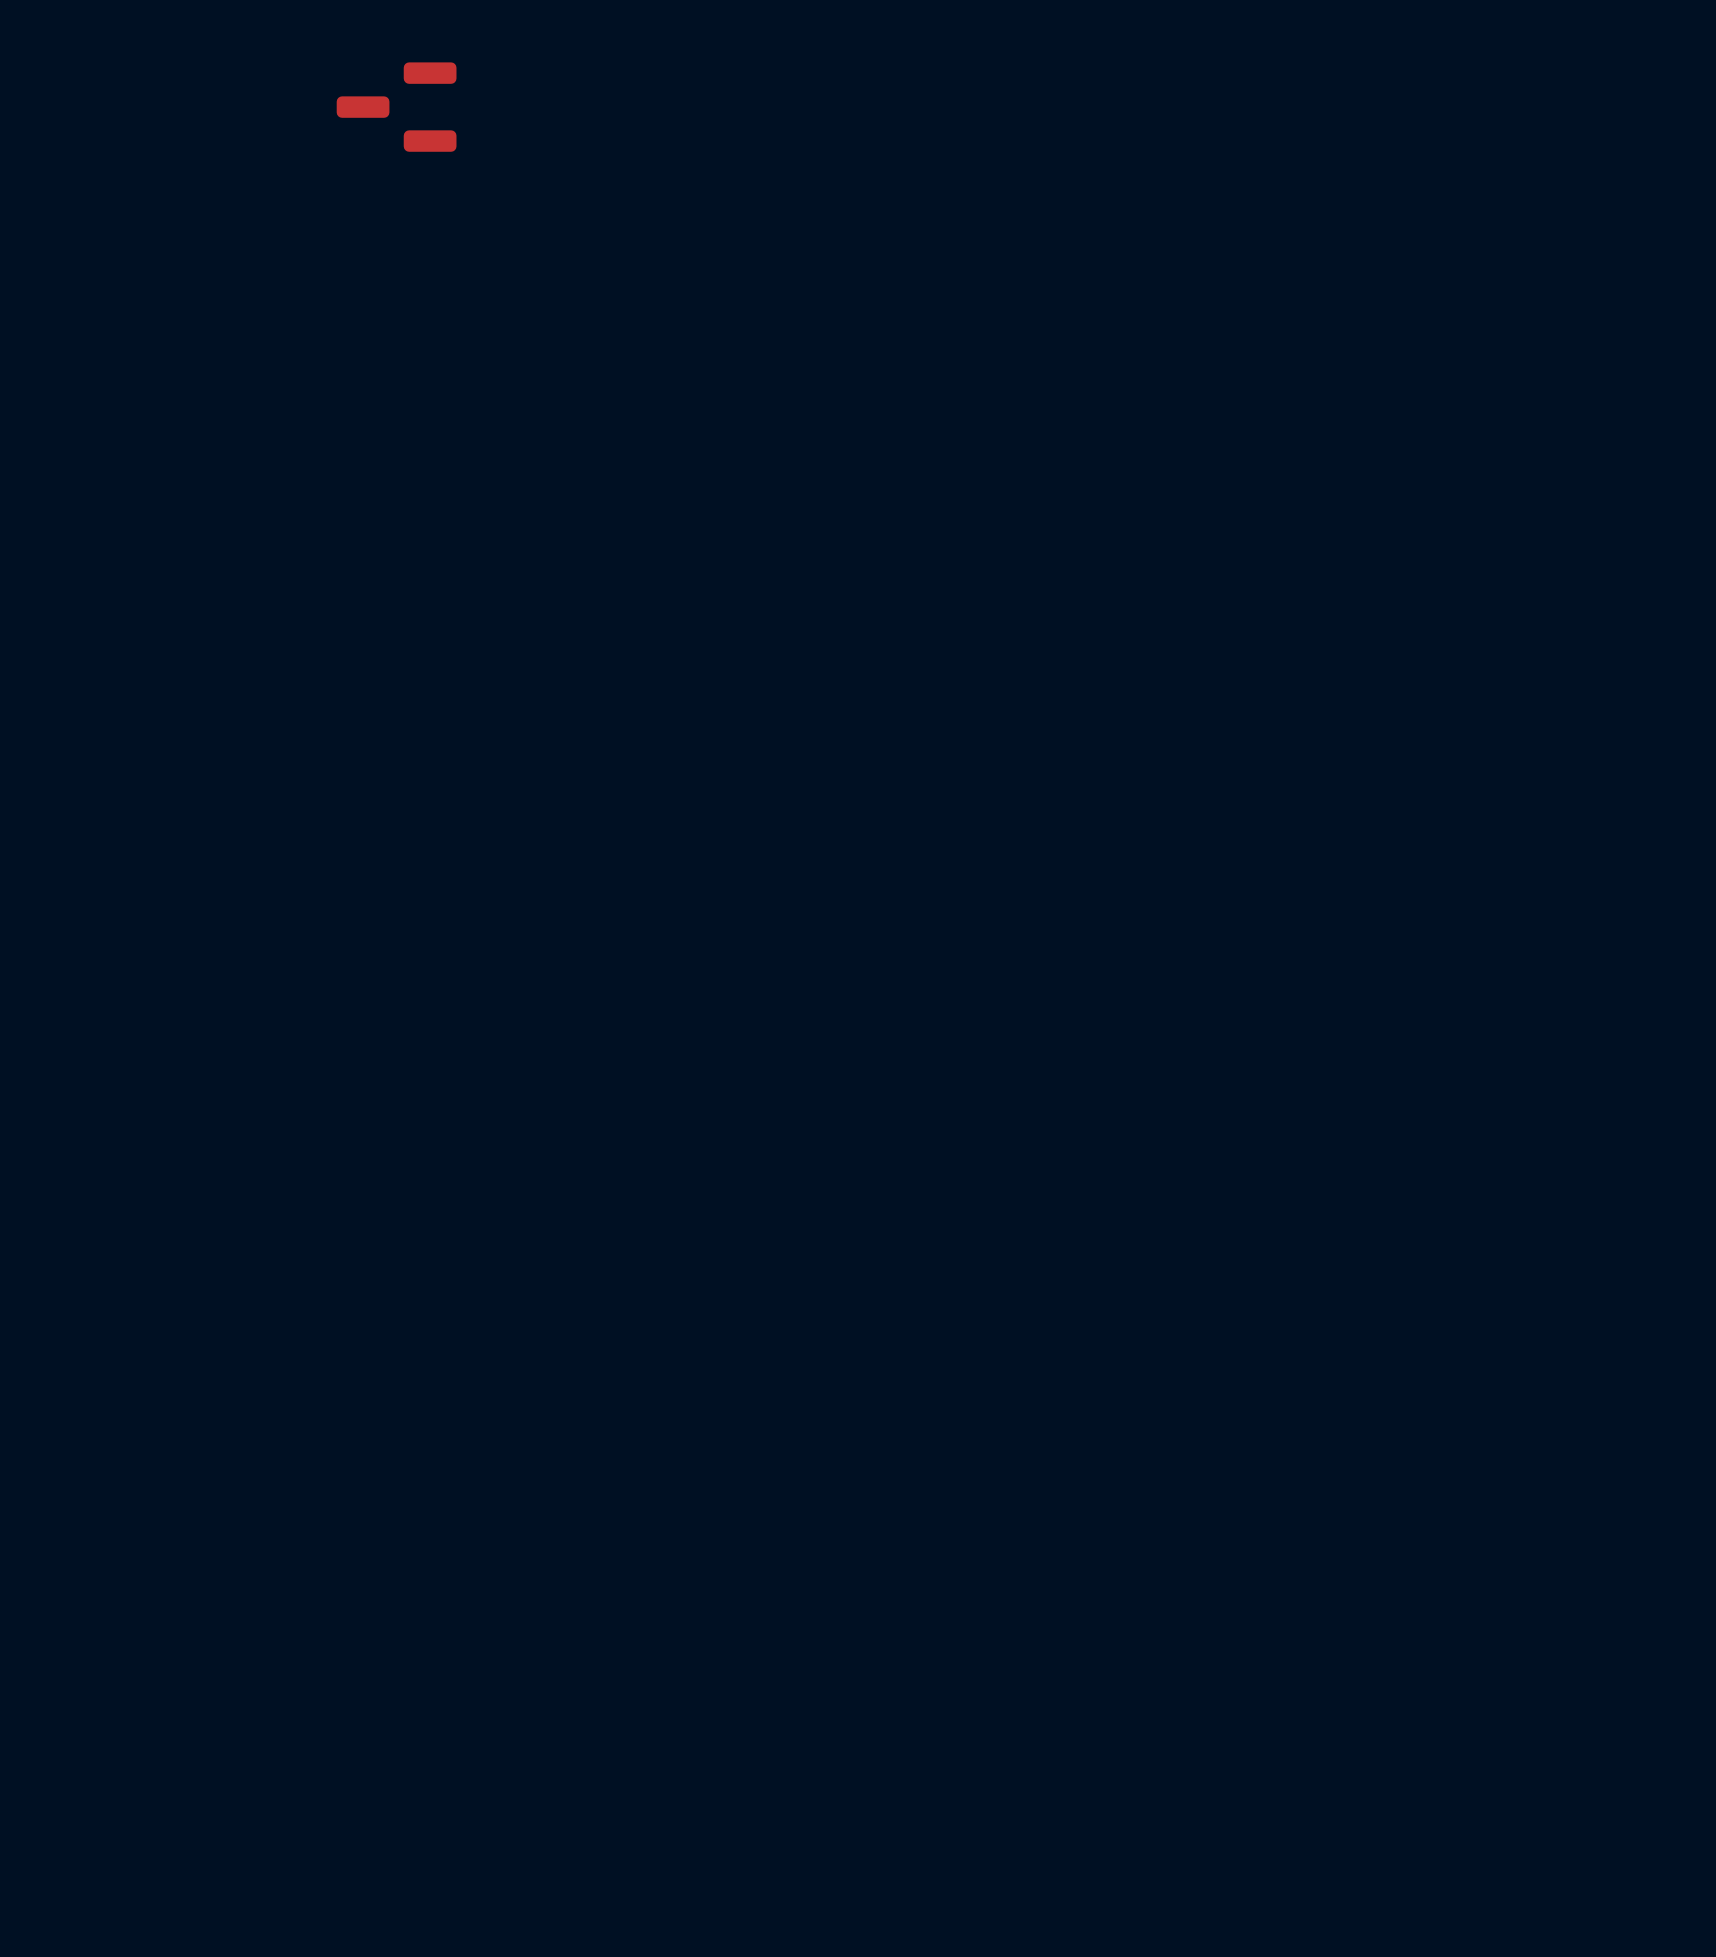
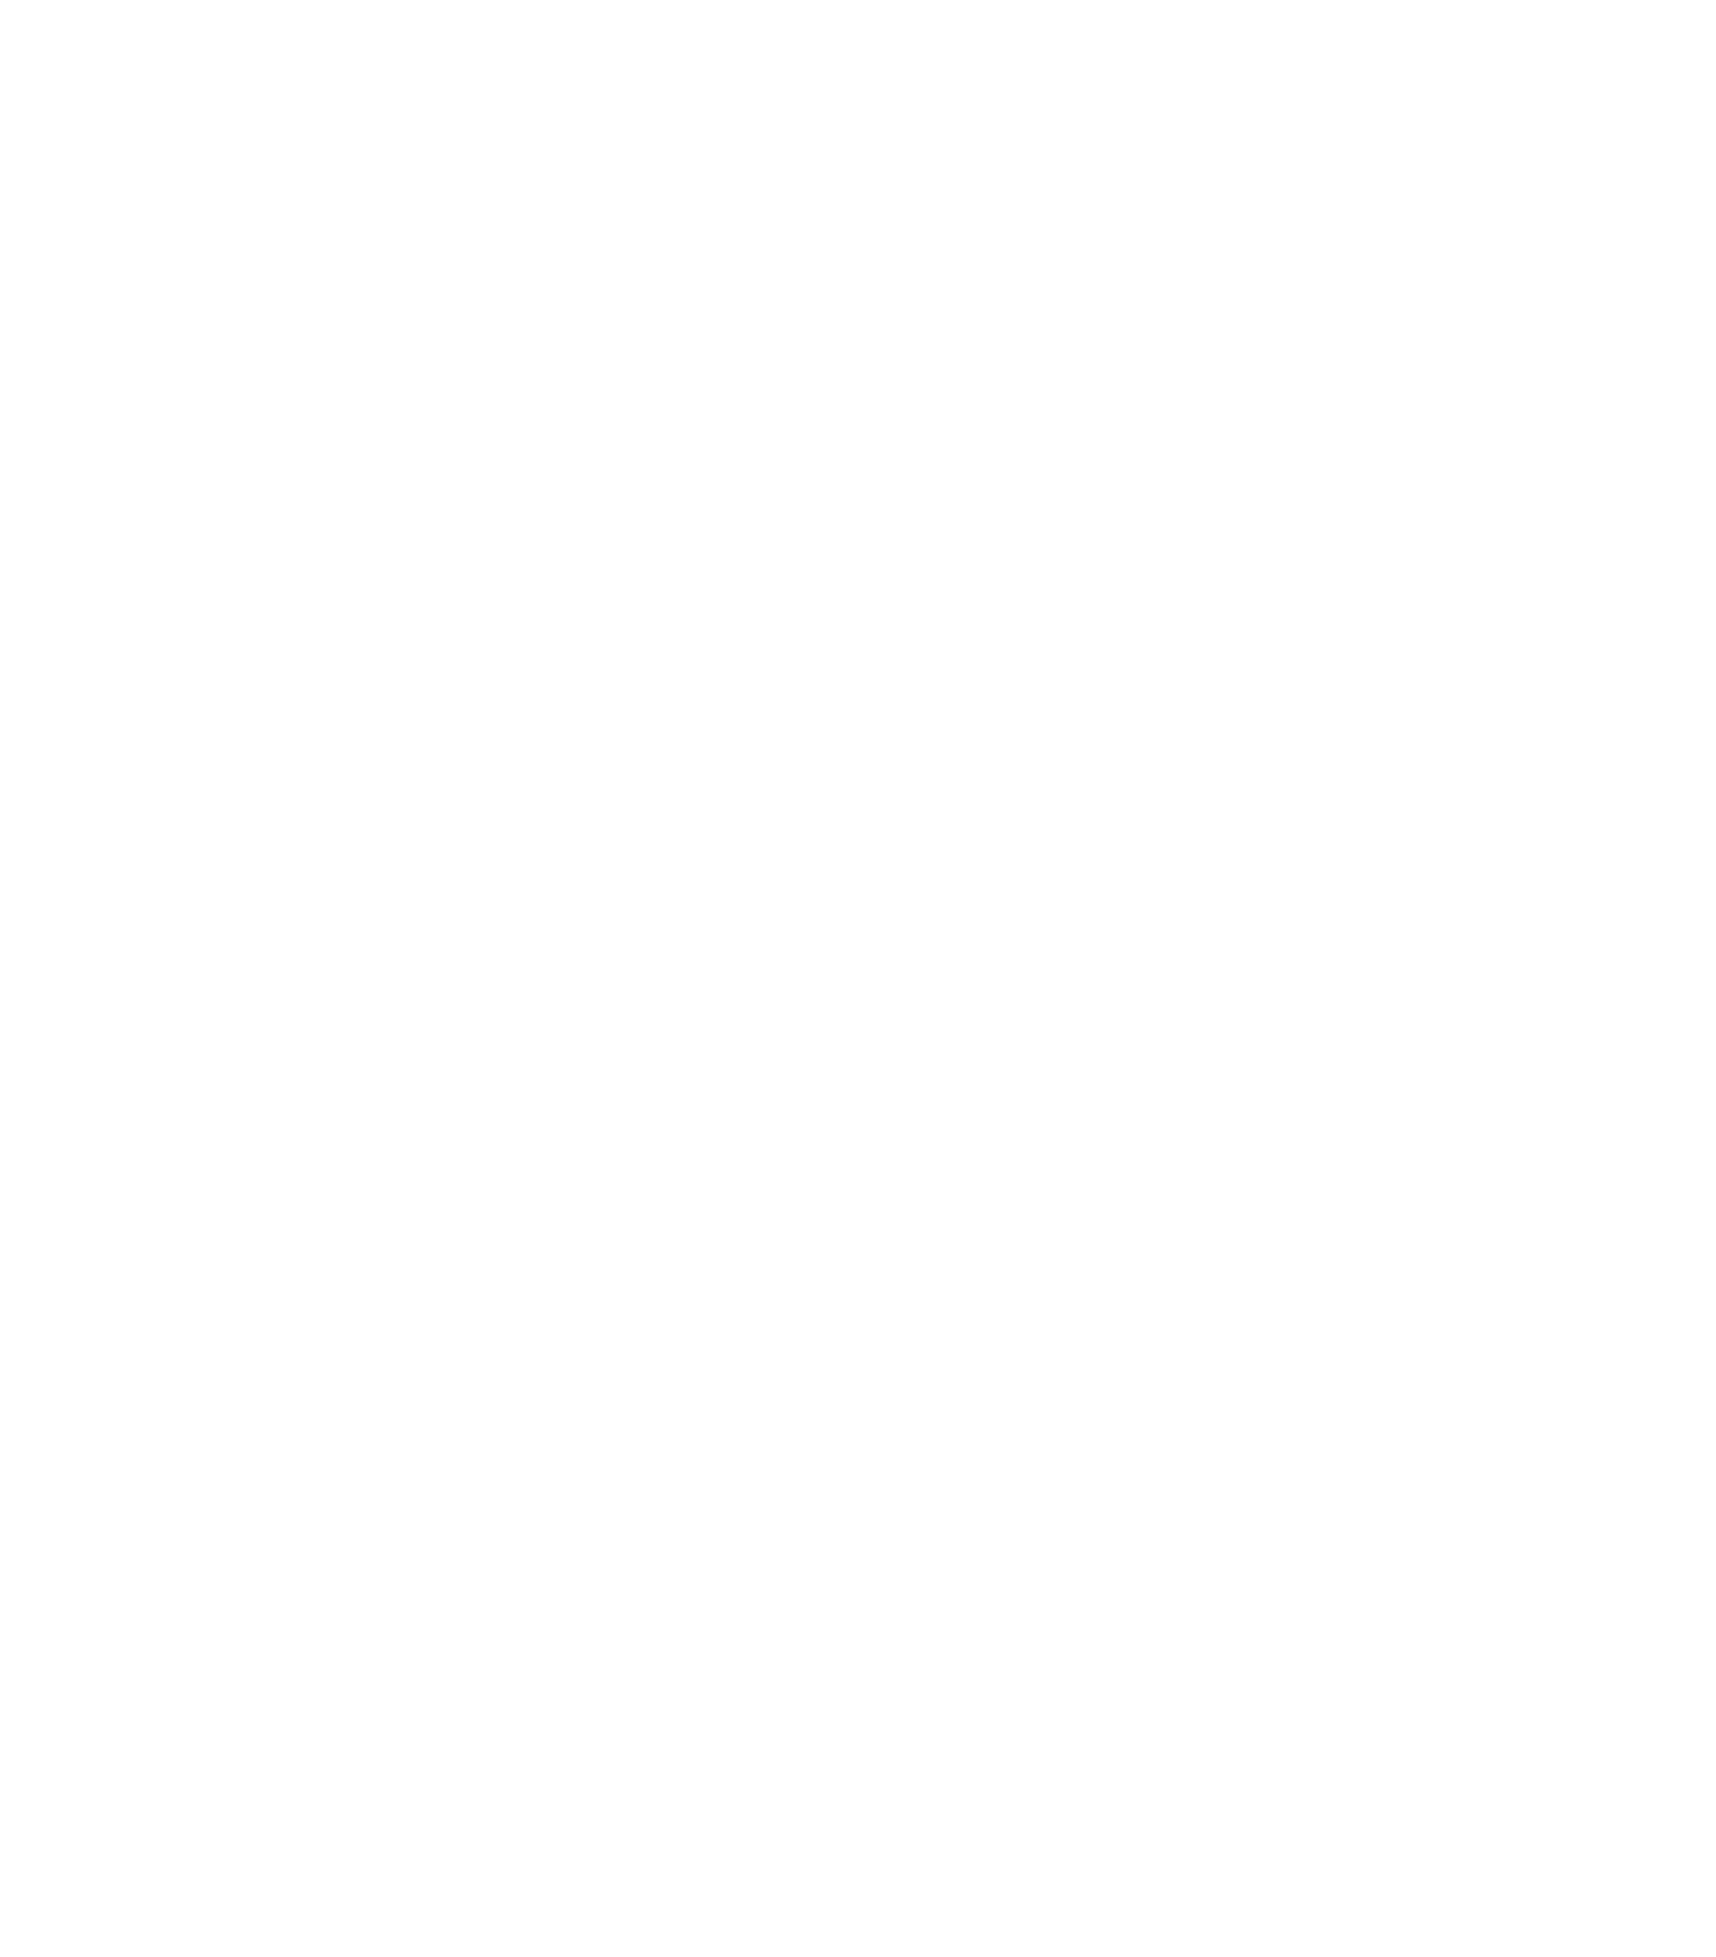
part: (396, 107) -> none

